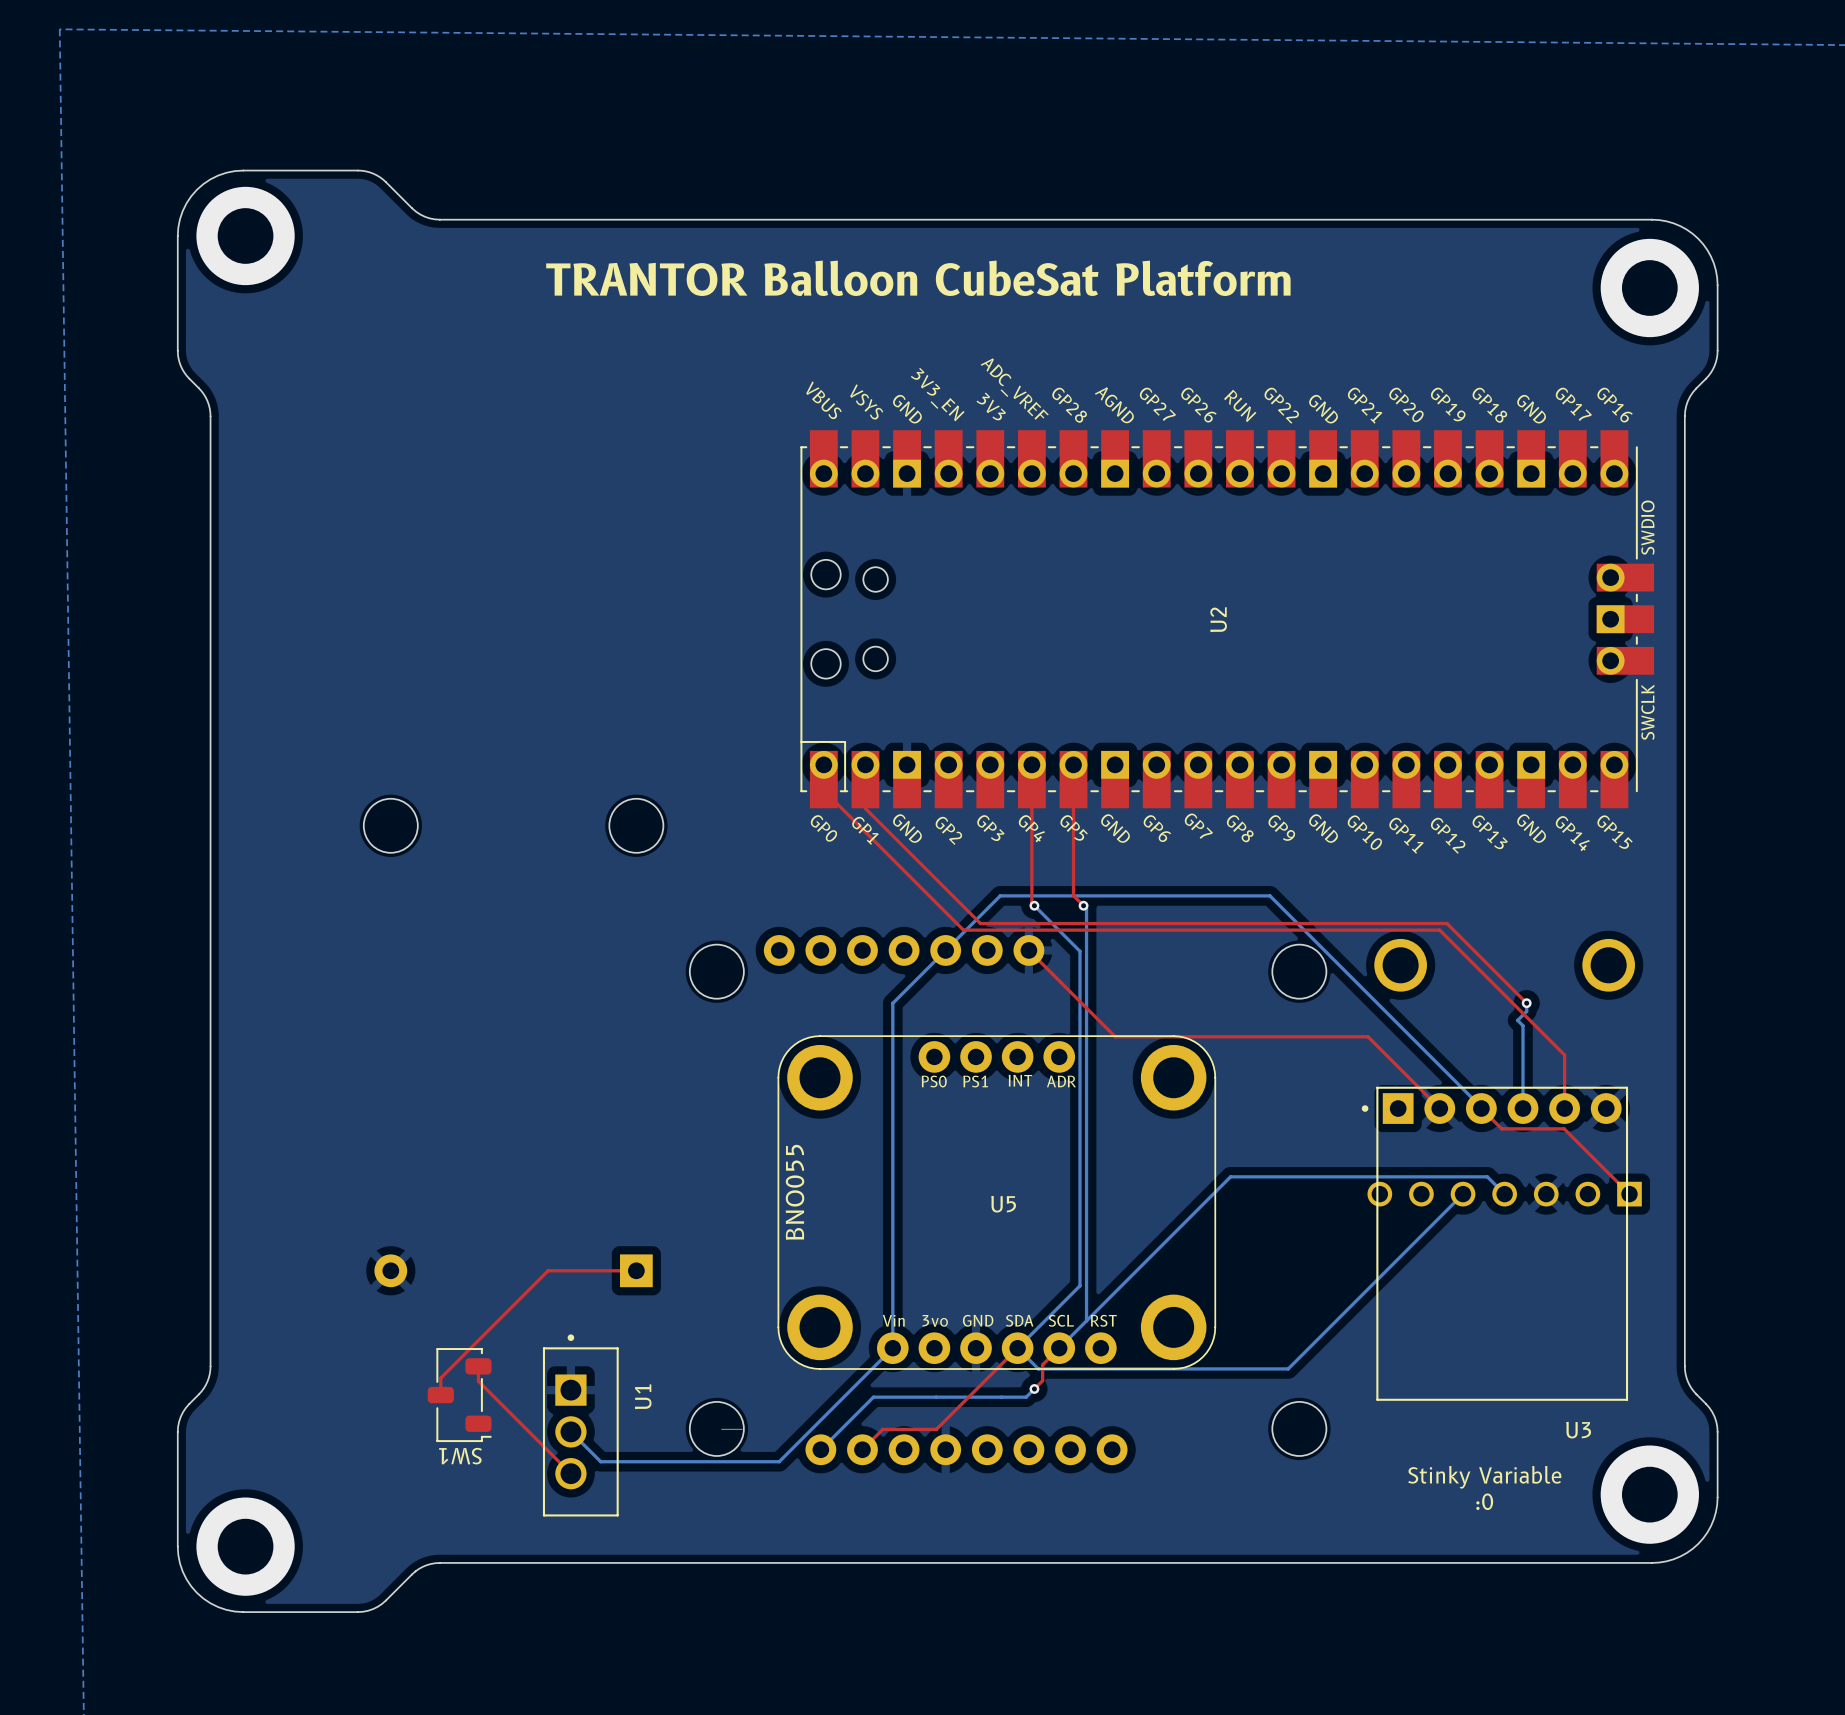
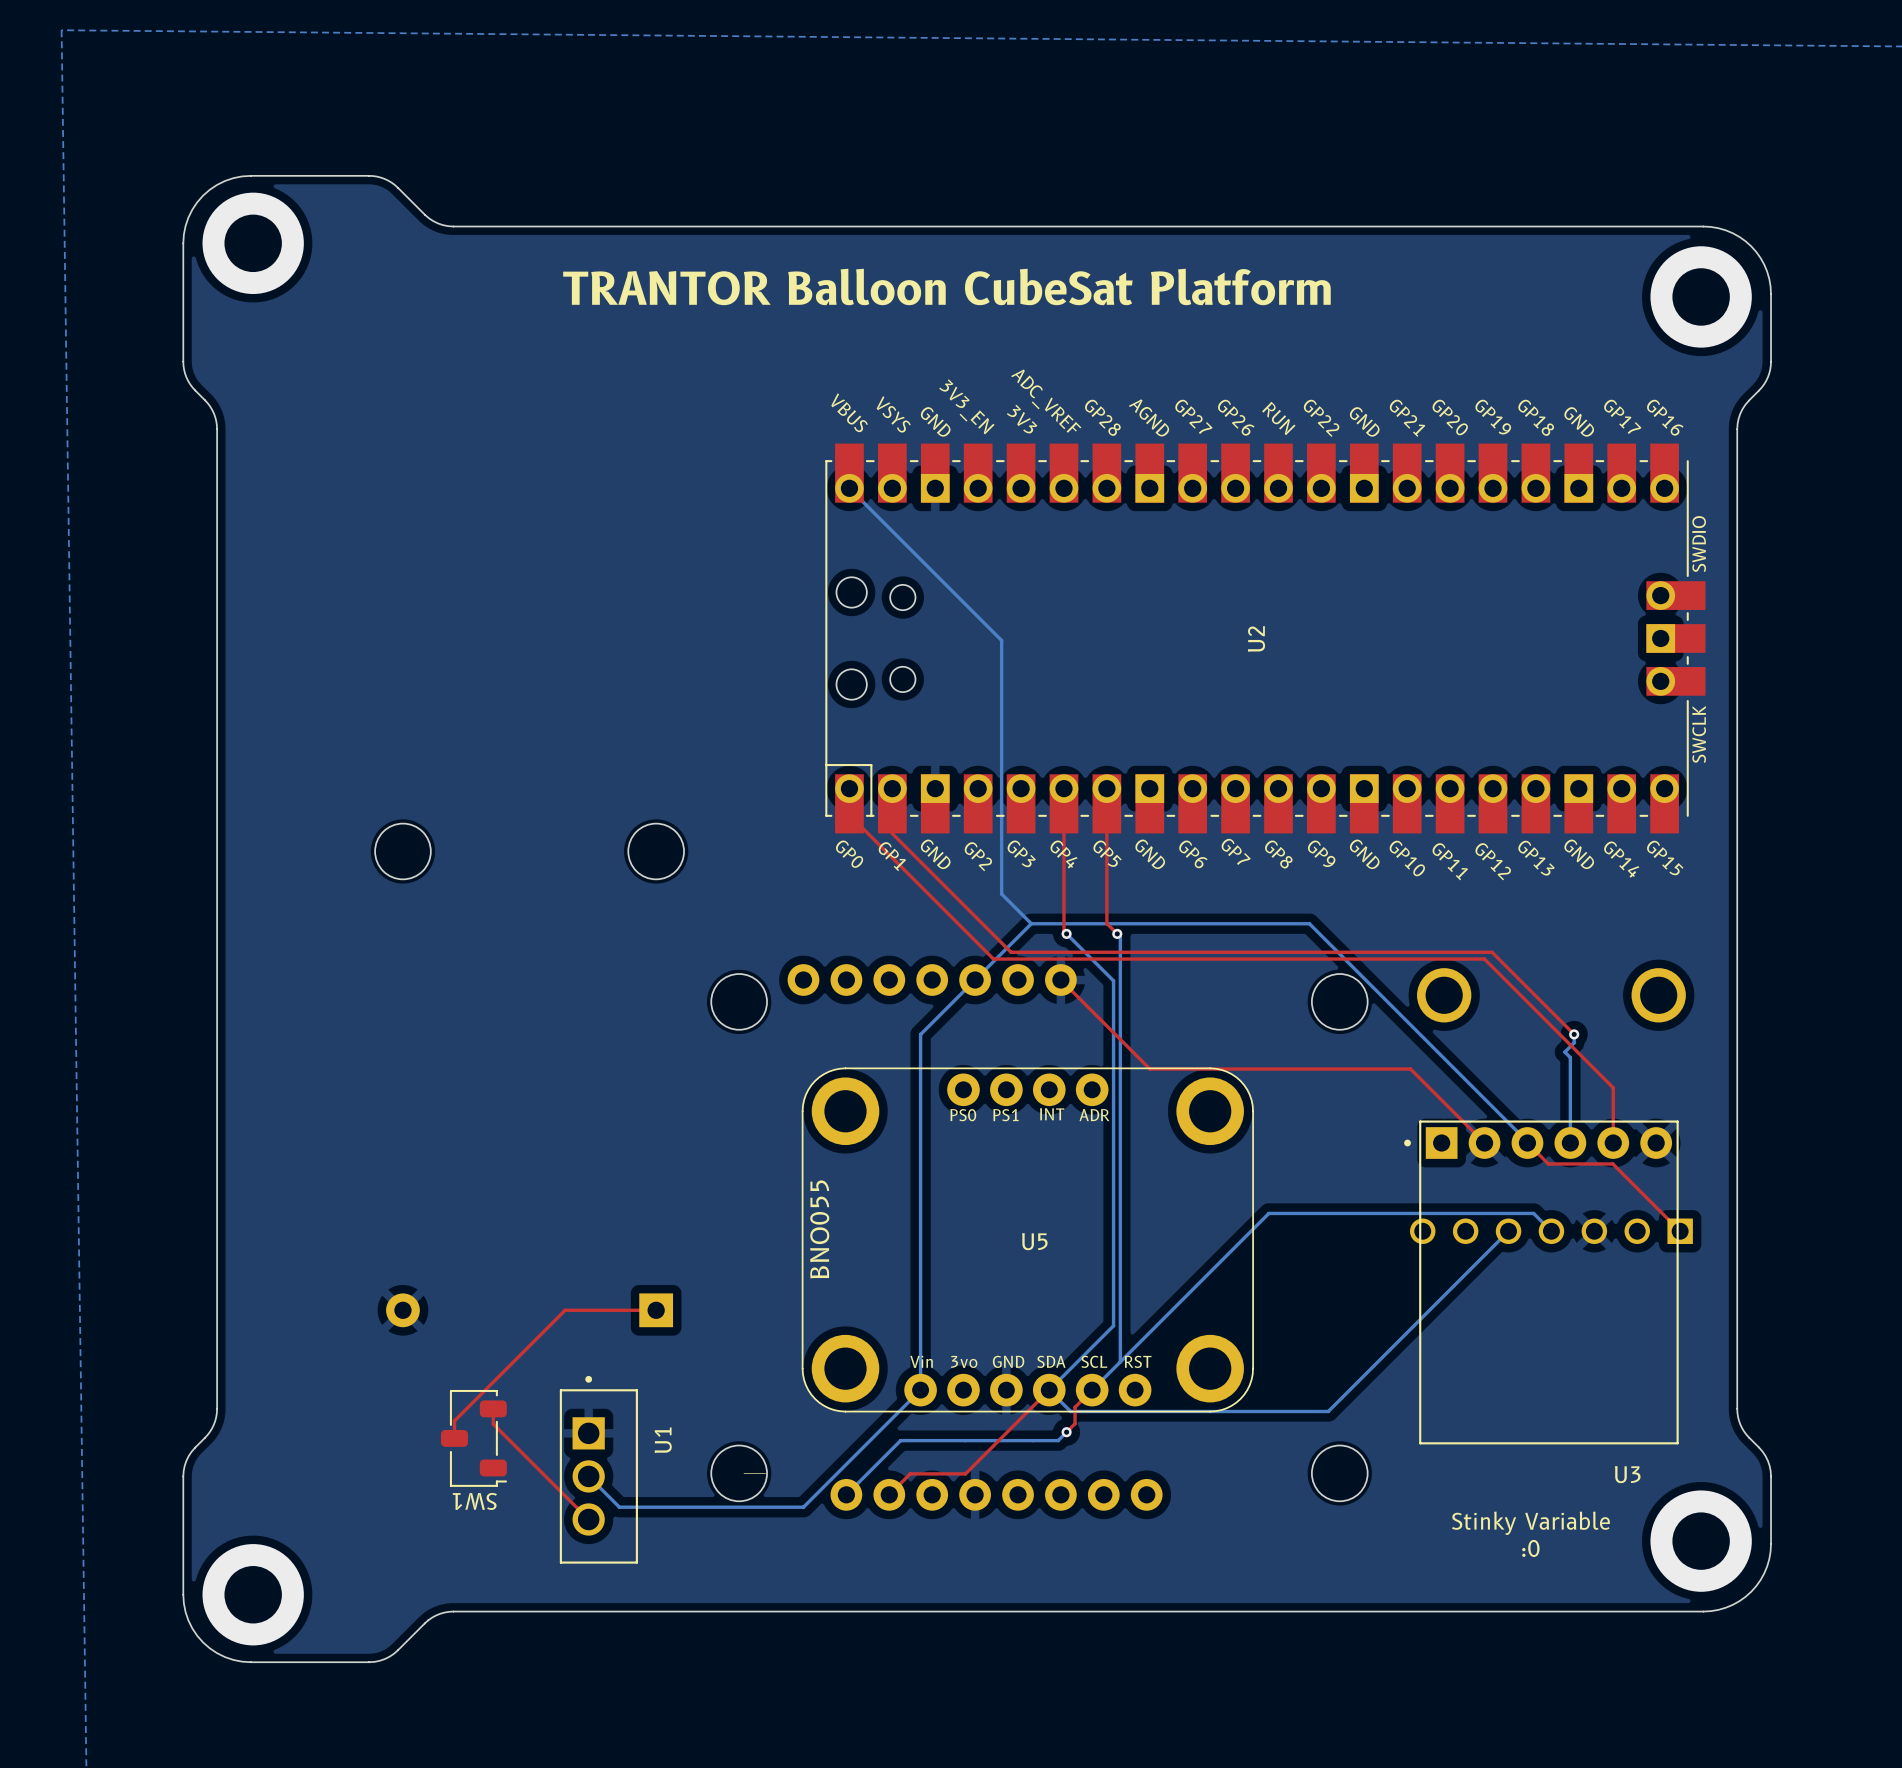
bottom track: none -> (849, 488) (1001, 640) (1001, 894) (1031, 923)

